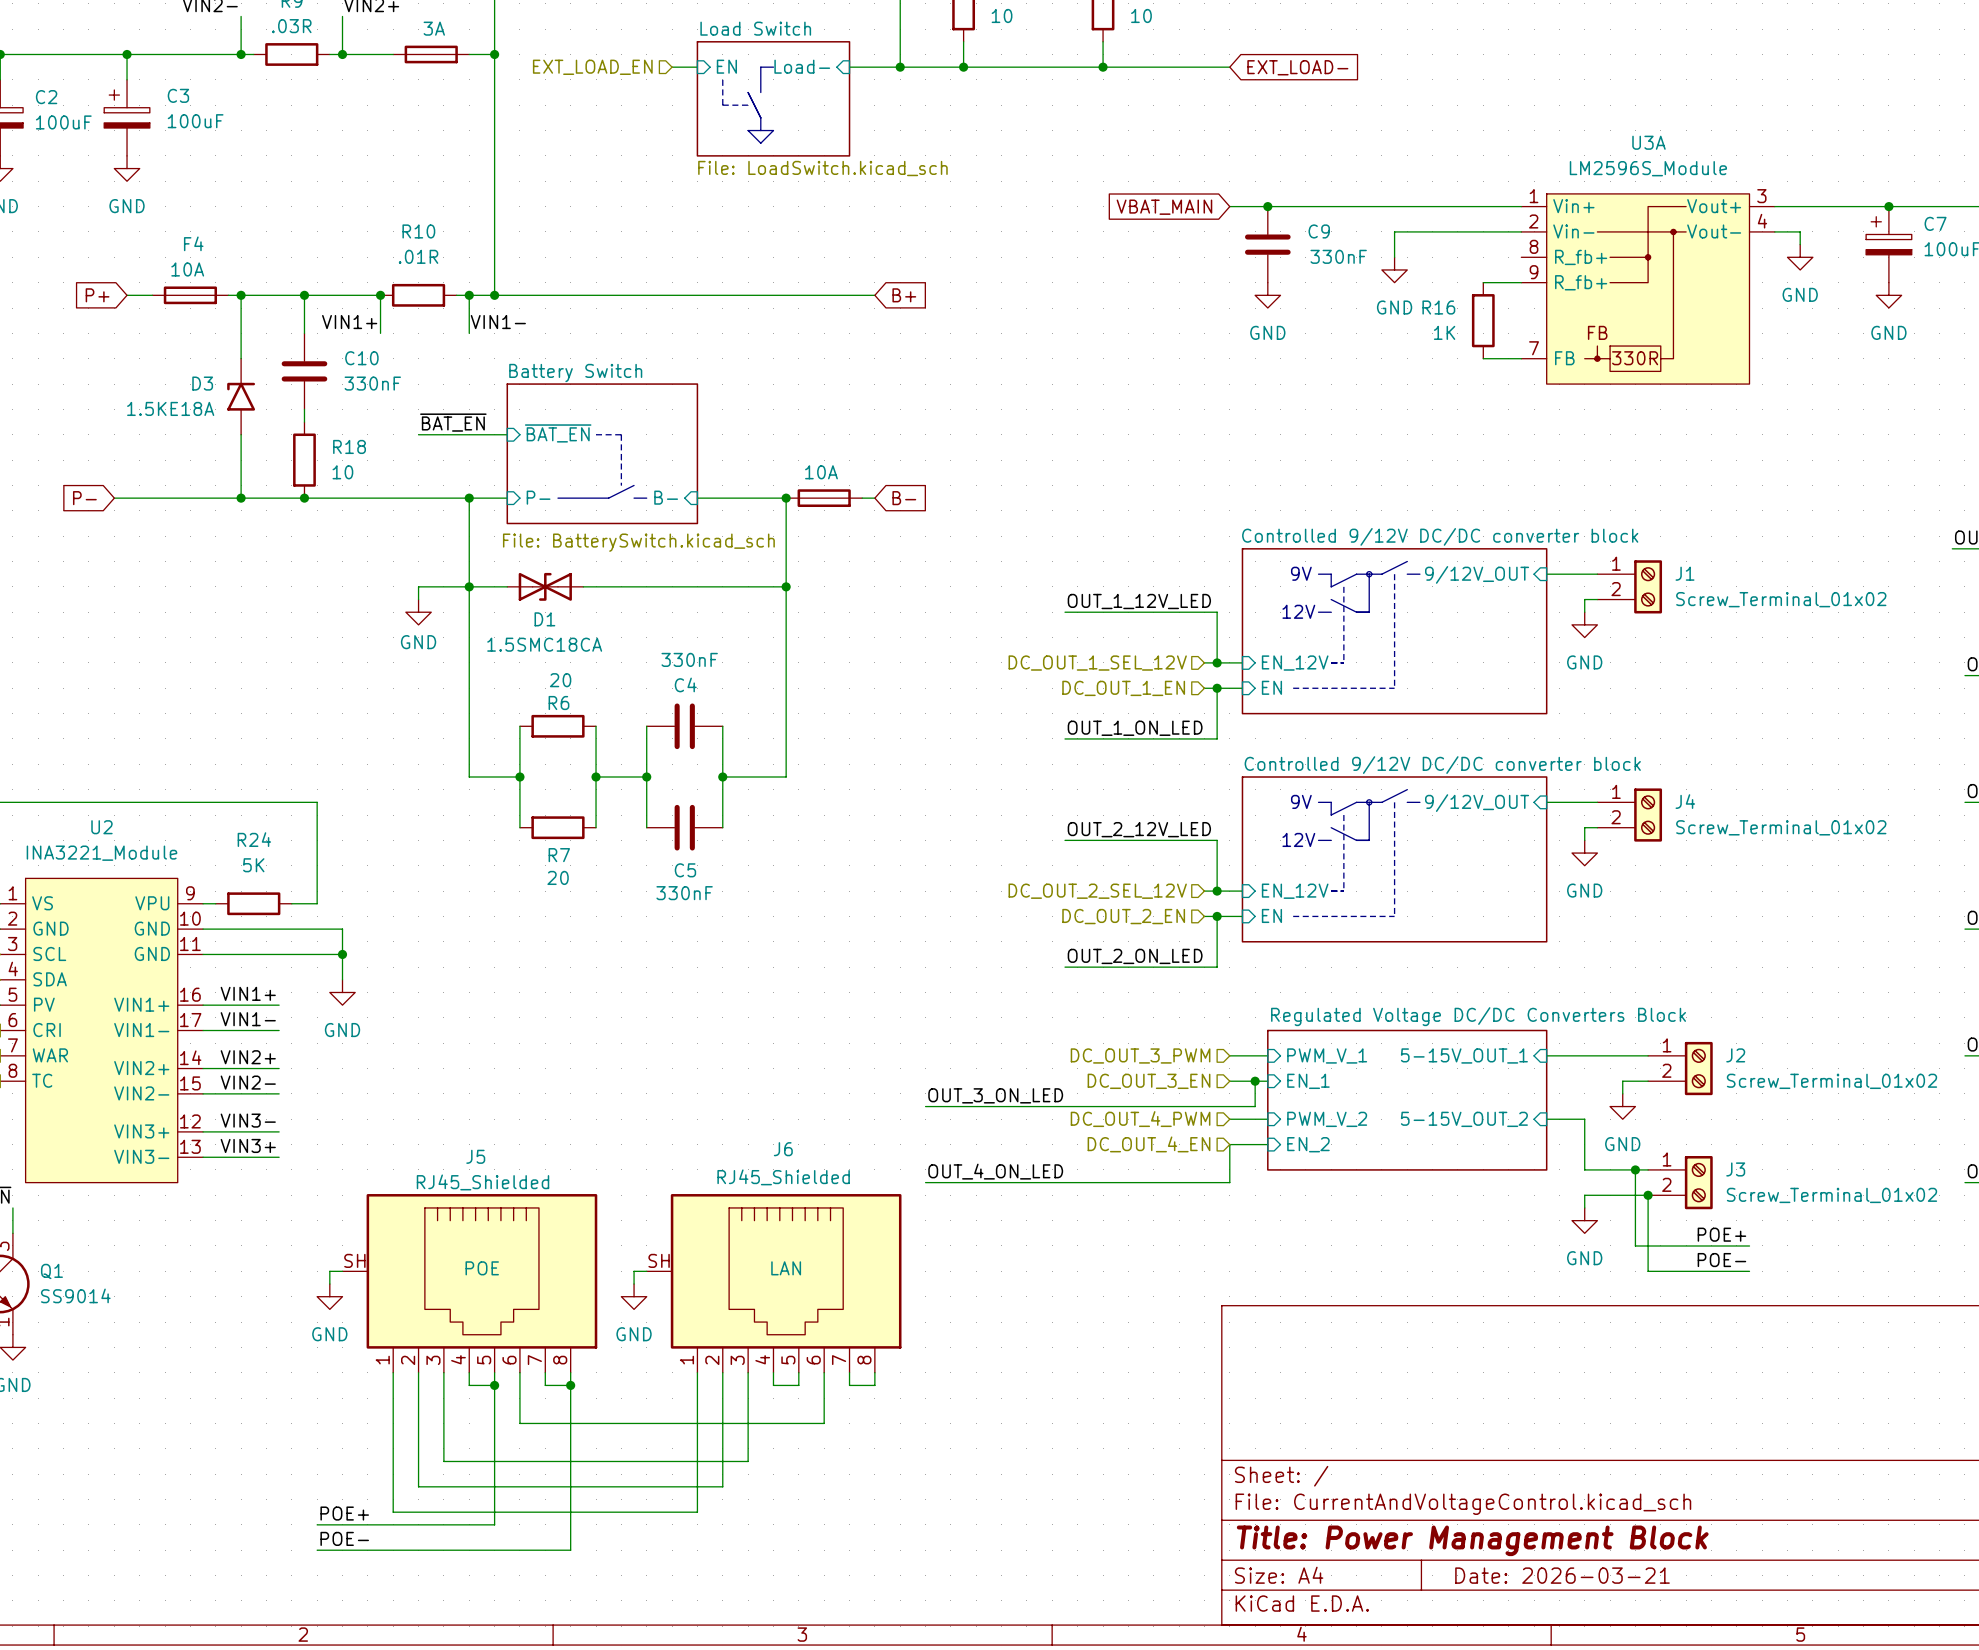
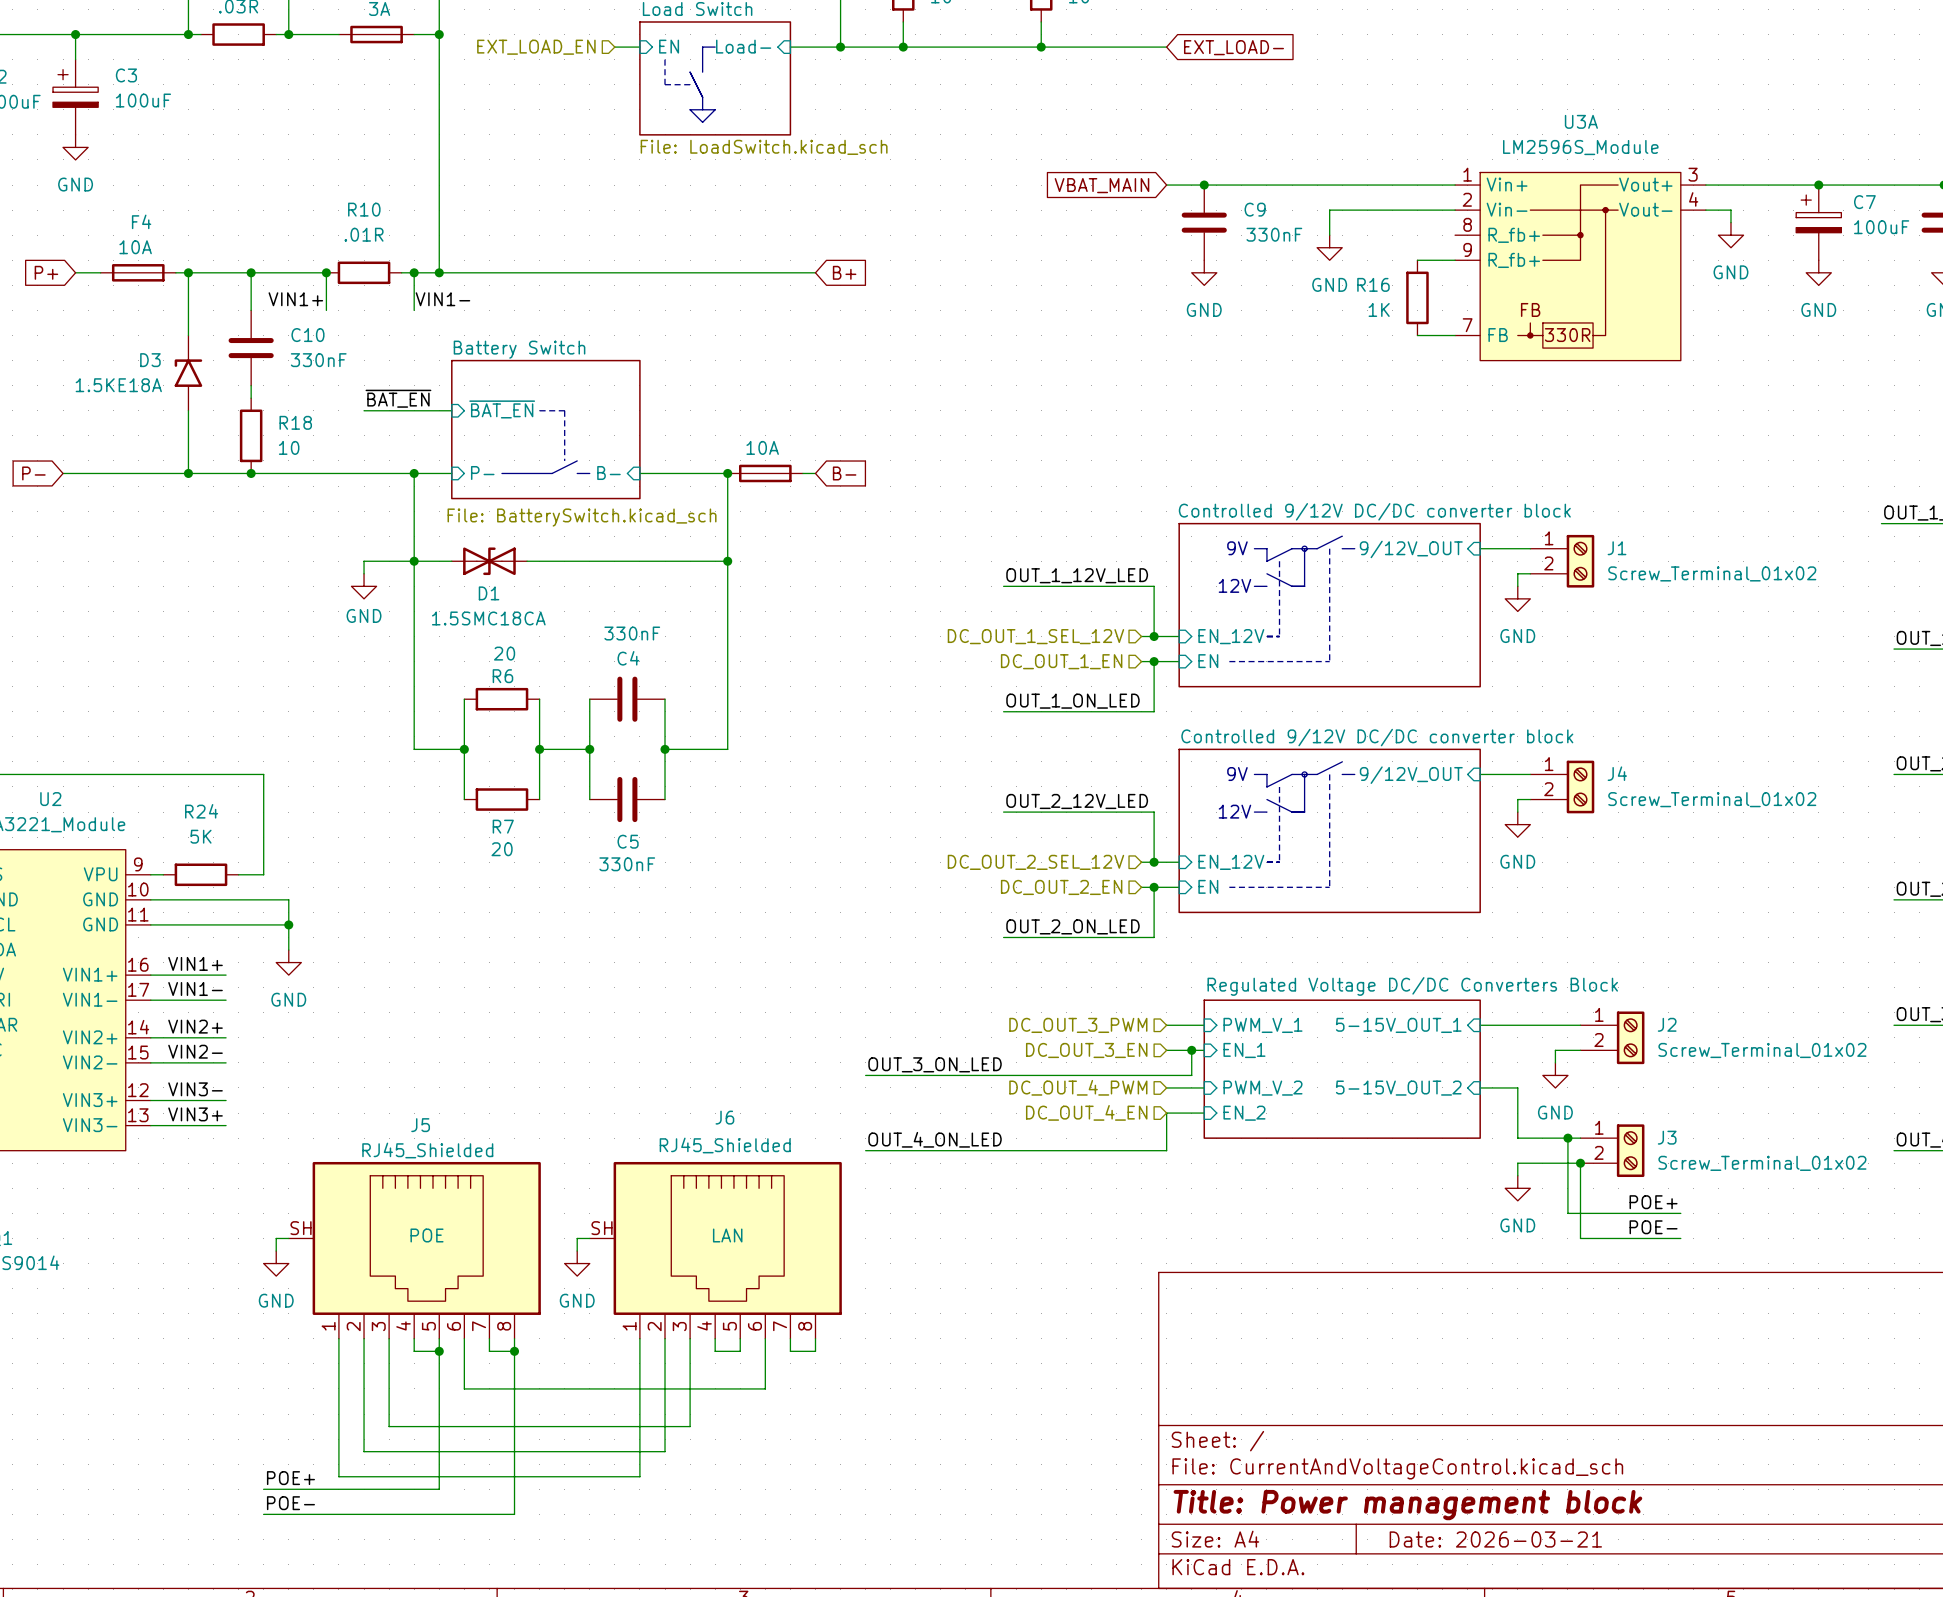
title block: Title: Power Management Block (1472, 1540) -> Title: Power management block (1407, 1505)

